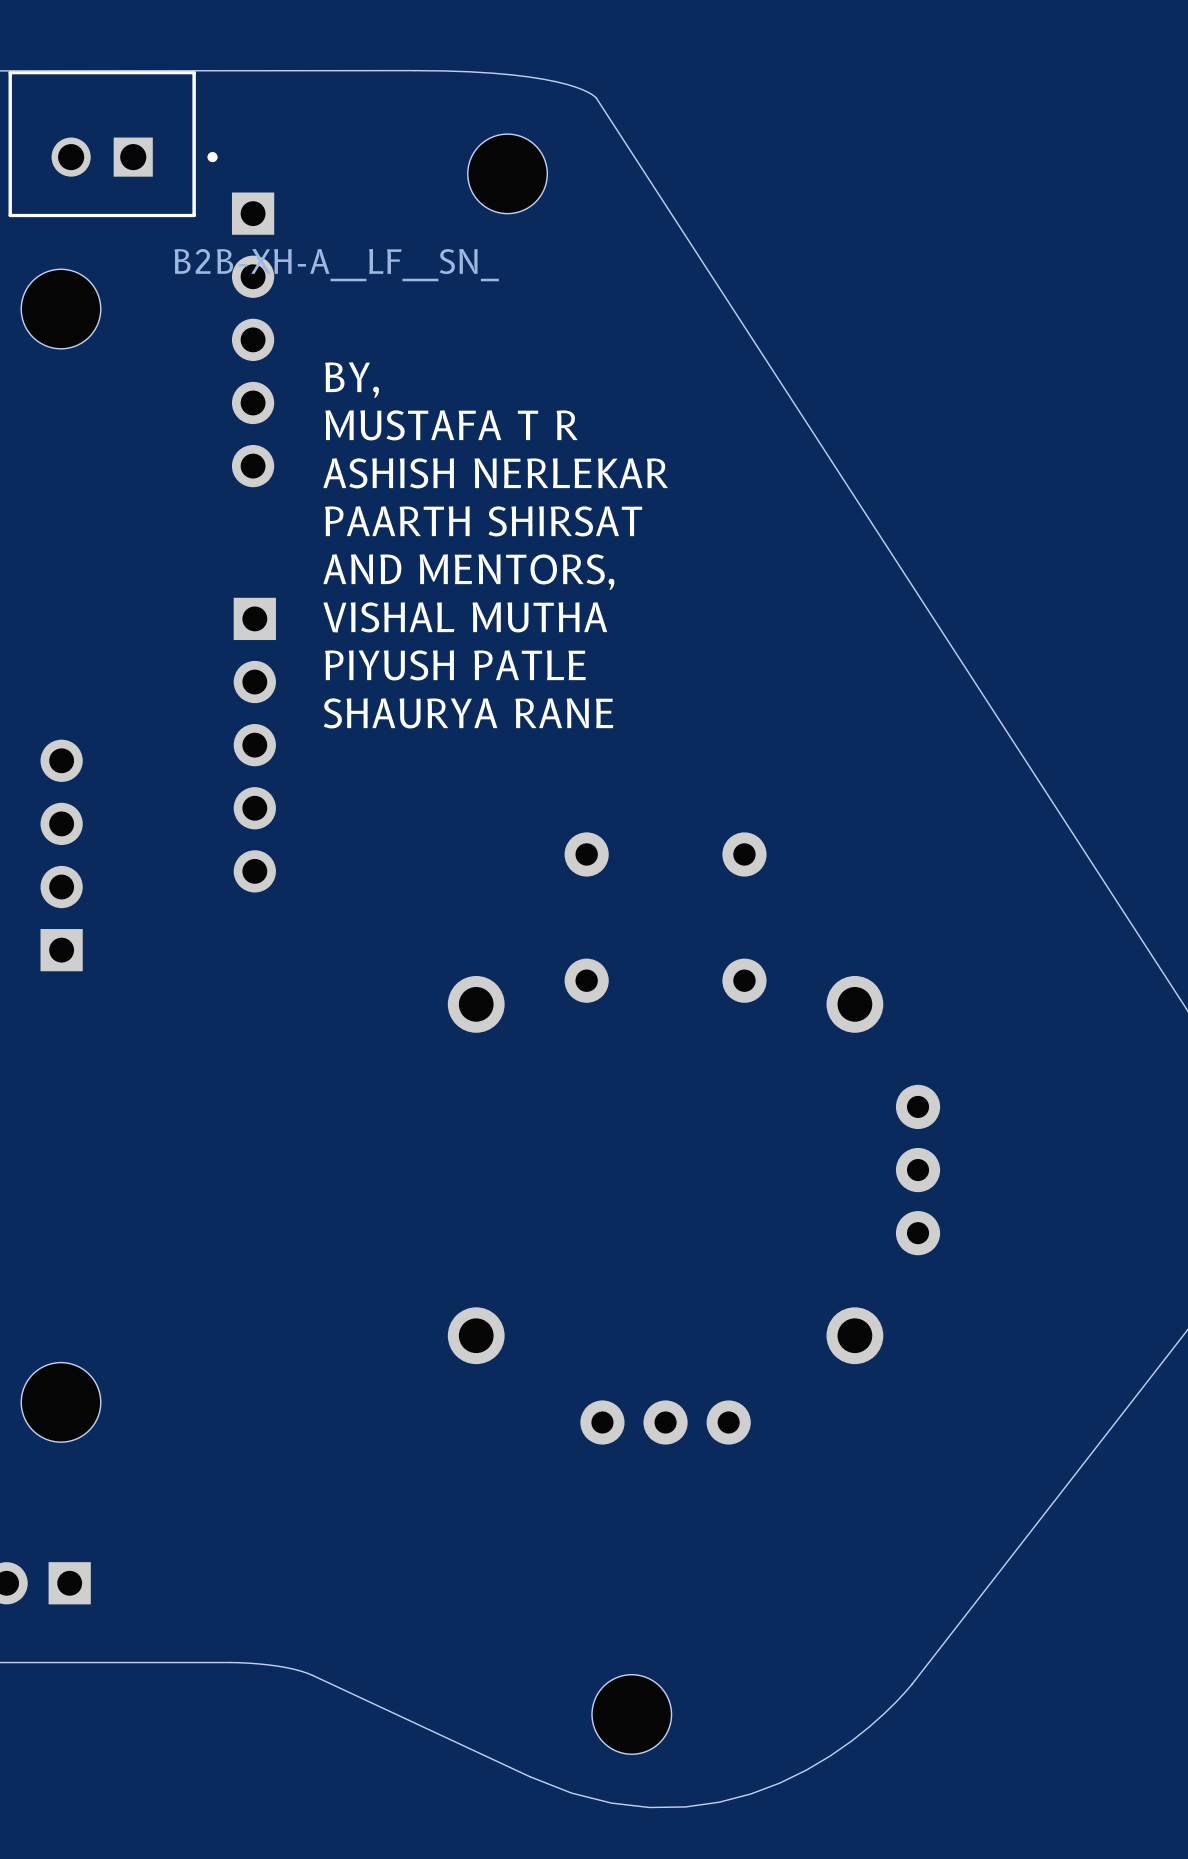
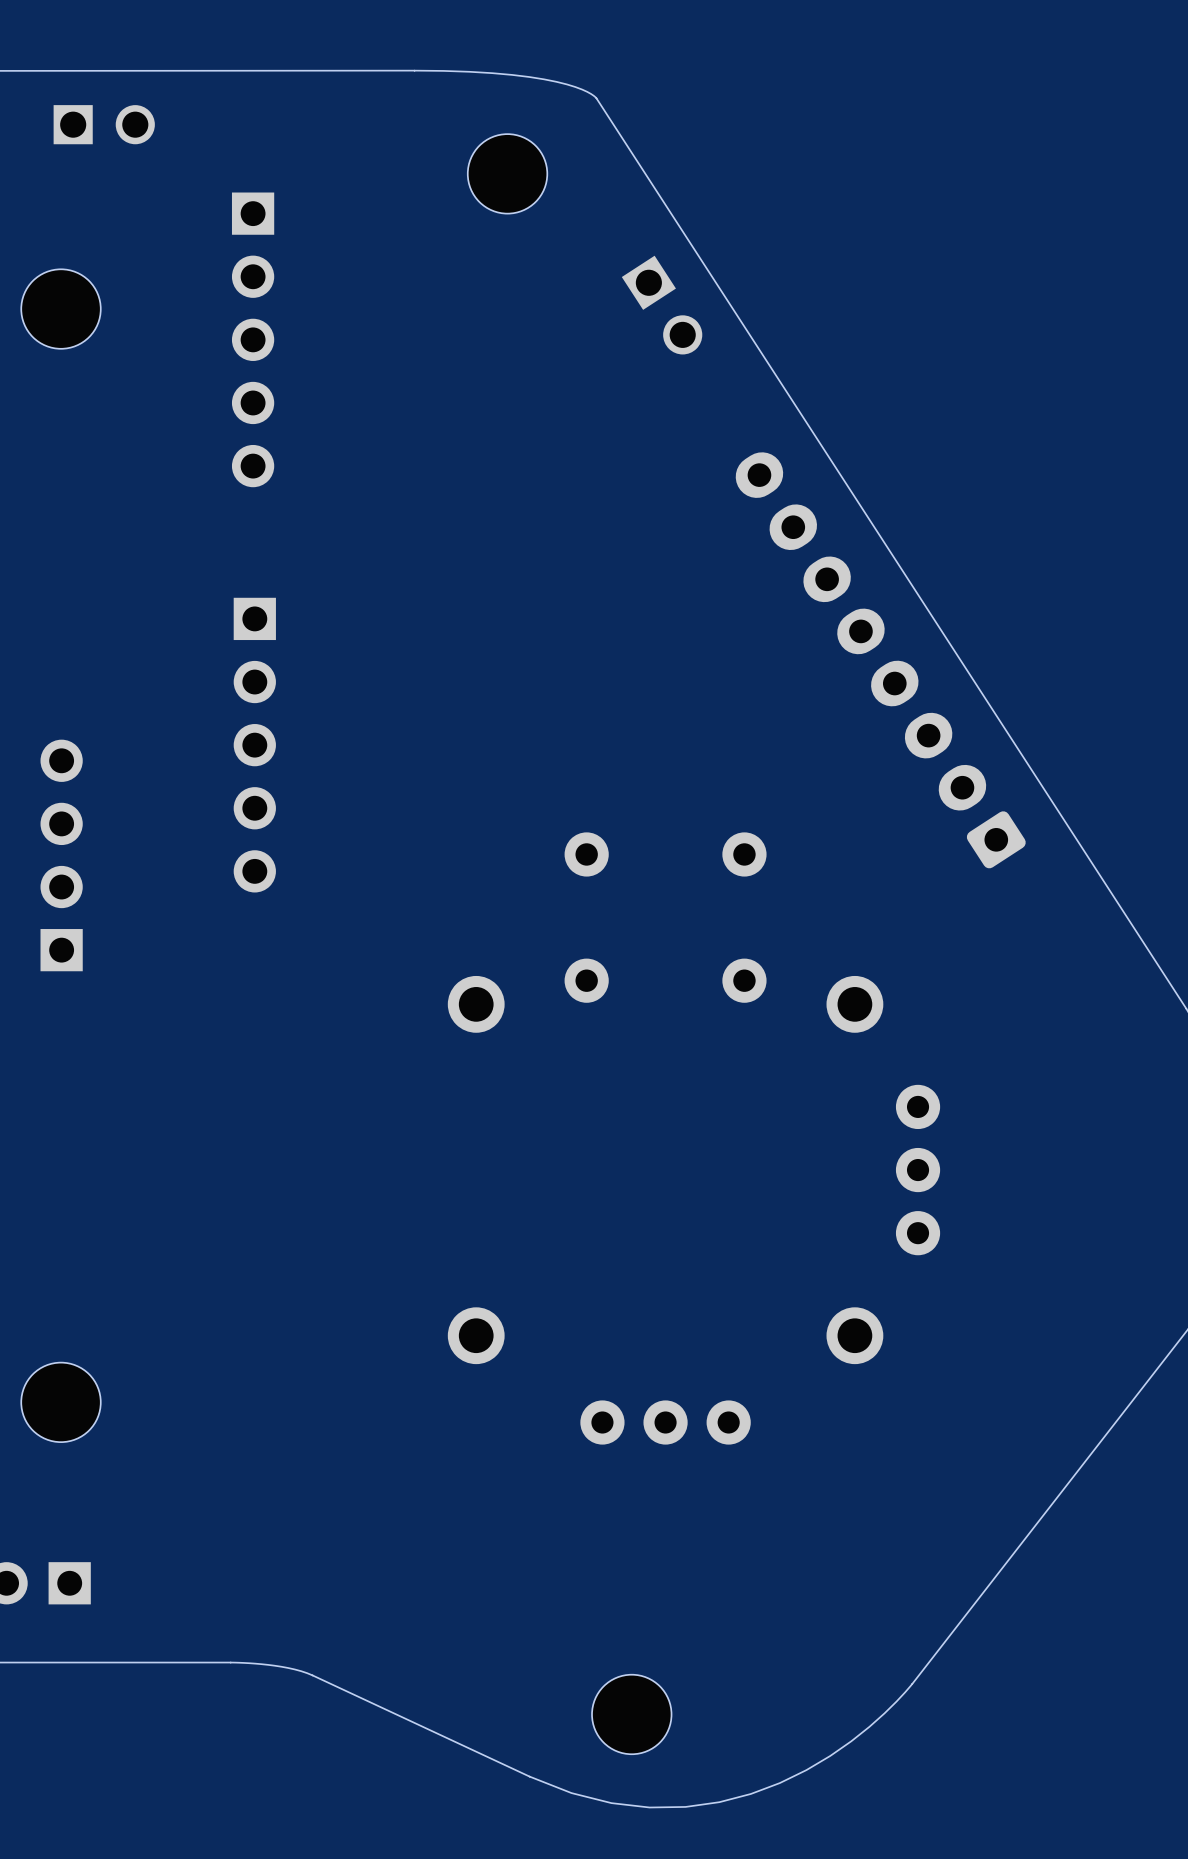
part side: bottom (113, 144) -> top (104, 124)
part: none -> (662, 305)
text: BY, (352, 380) -> none
text: MUSTAFA T R (451, 425) -> none
text: ASHISH NERLEKAR (495, 473) -> none
text: PAARTH SHIRSAT (483, 521) -> none
text: AND MENTORS, (468, 572) -> none
text: VISHAL MUTHA (465, 617) -> none
part: none -> (880, 660)
text: PIYUSH PATLE (455, 665) -> none
text: SHAURYA RANE (468, 713) -> none

